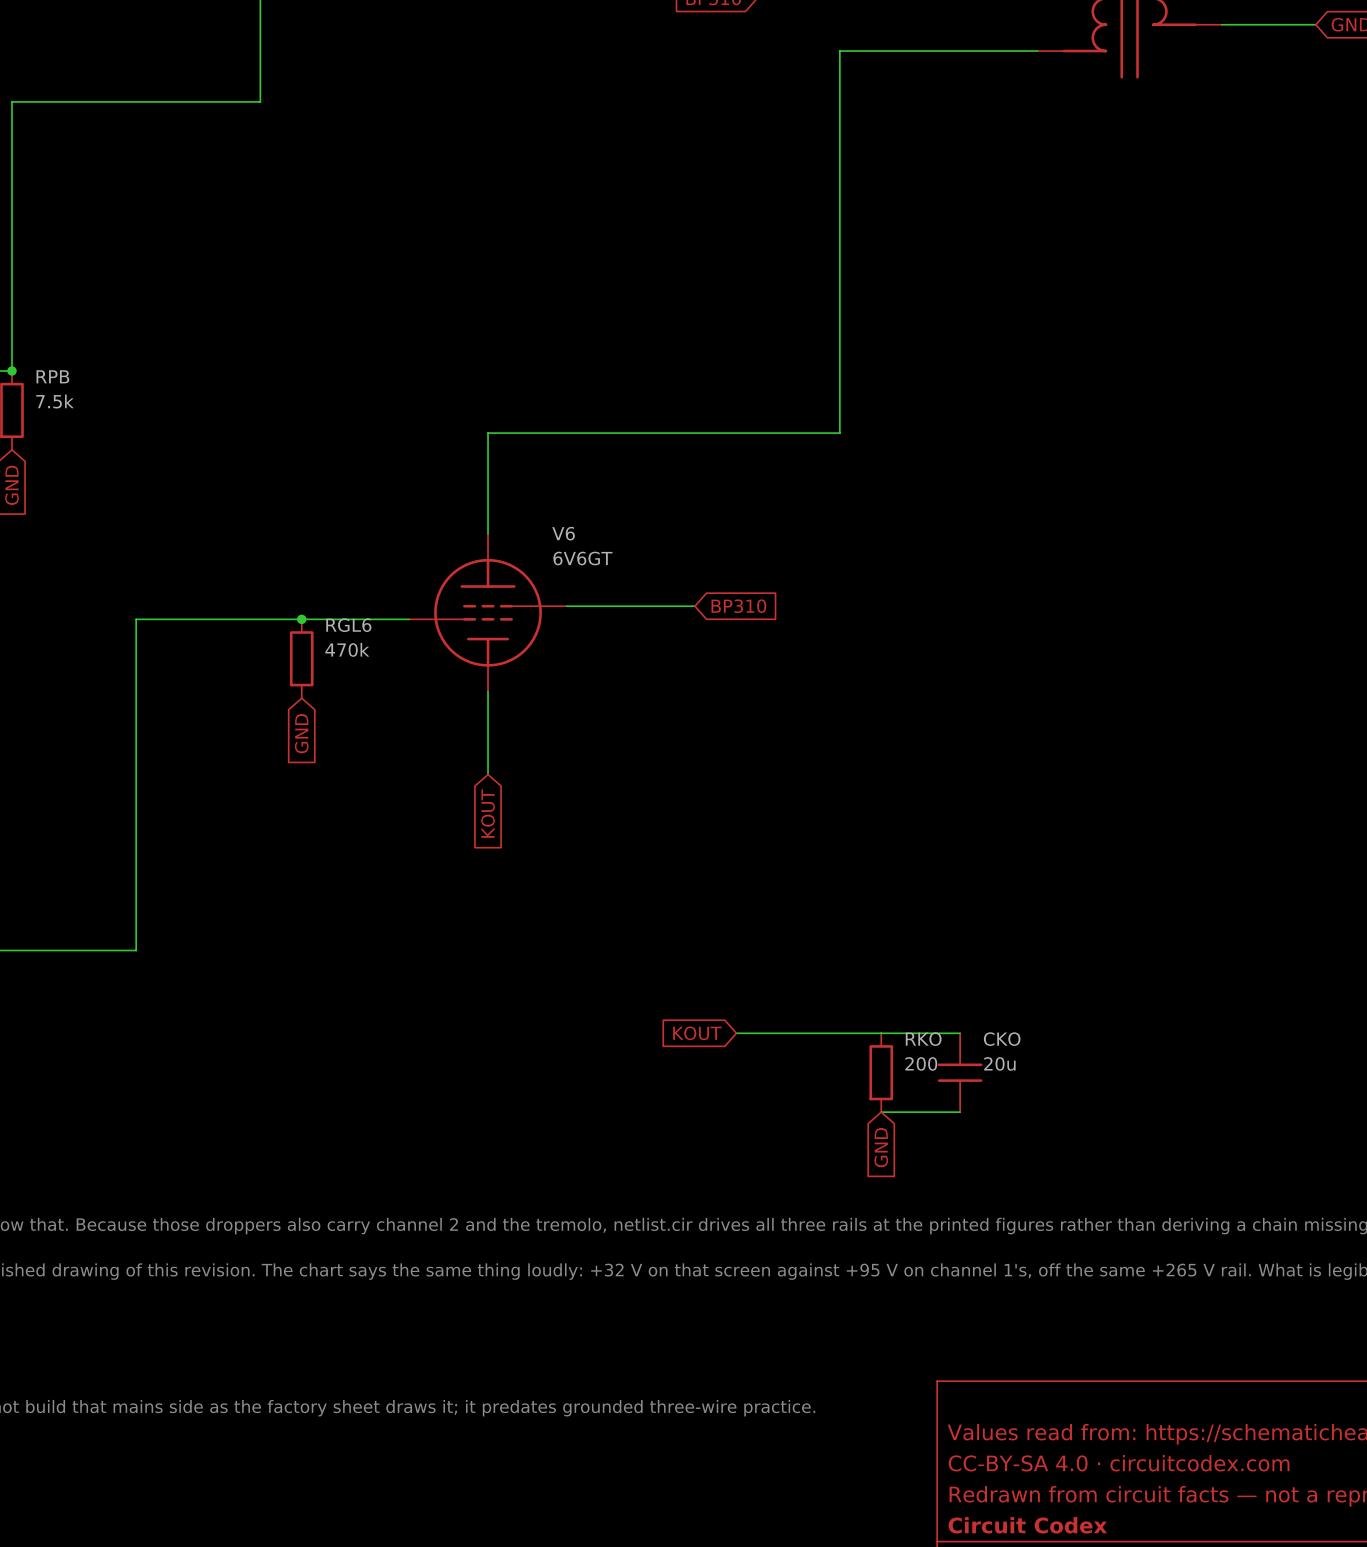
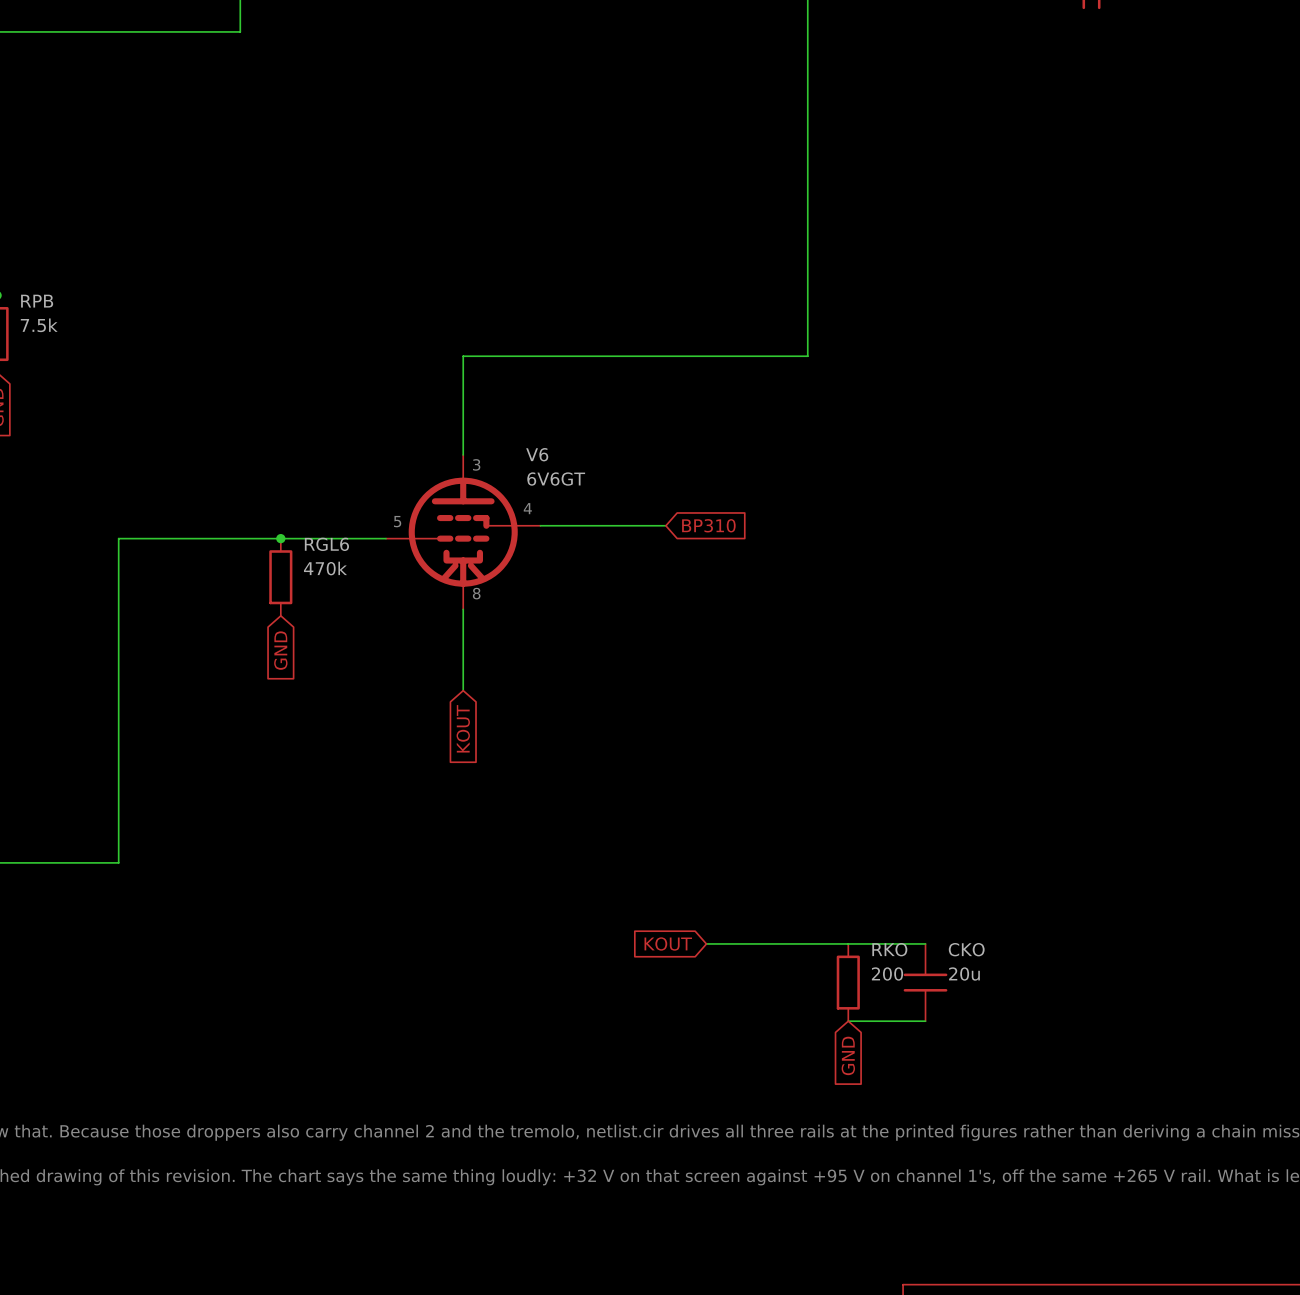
V6 symbol: [409, 533, 567, 692] -> [386, 454, 541, 610]
text: none -> 3 (476, 464)
text: none -> 4 (527, 508)
text: none -> 5 (397, 521)
text: none -> 8 (476, 593)

